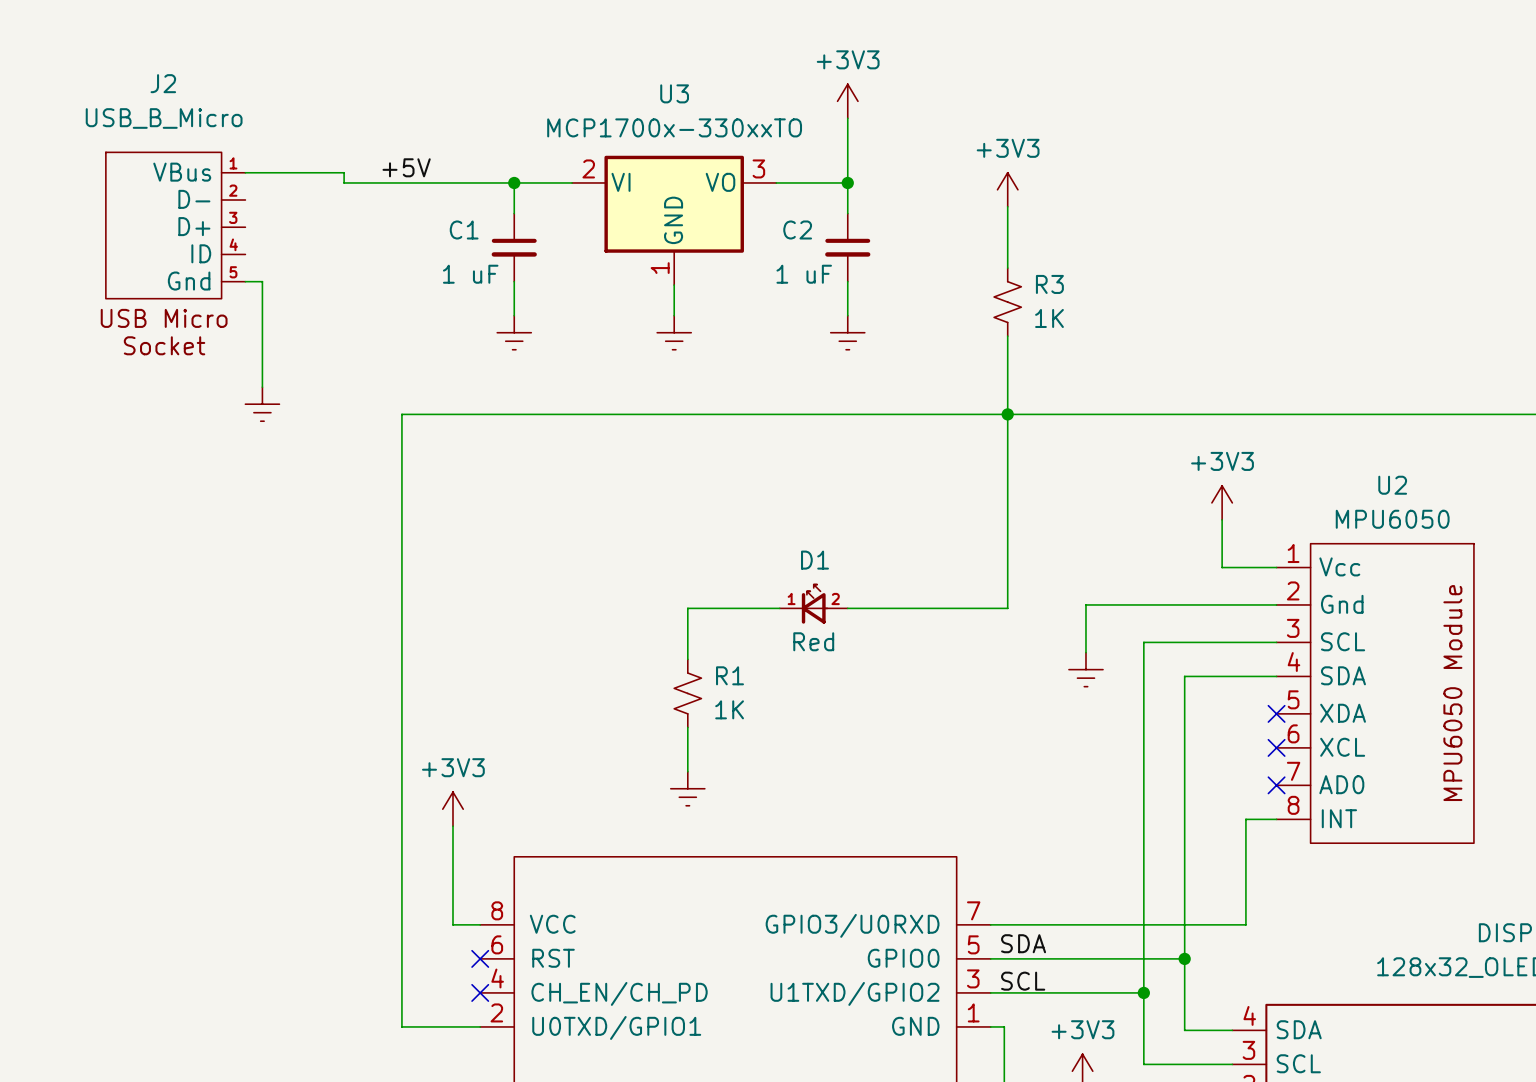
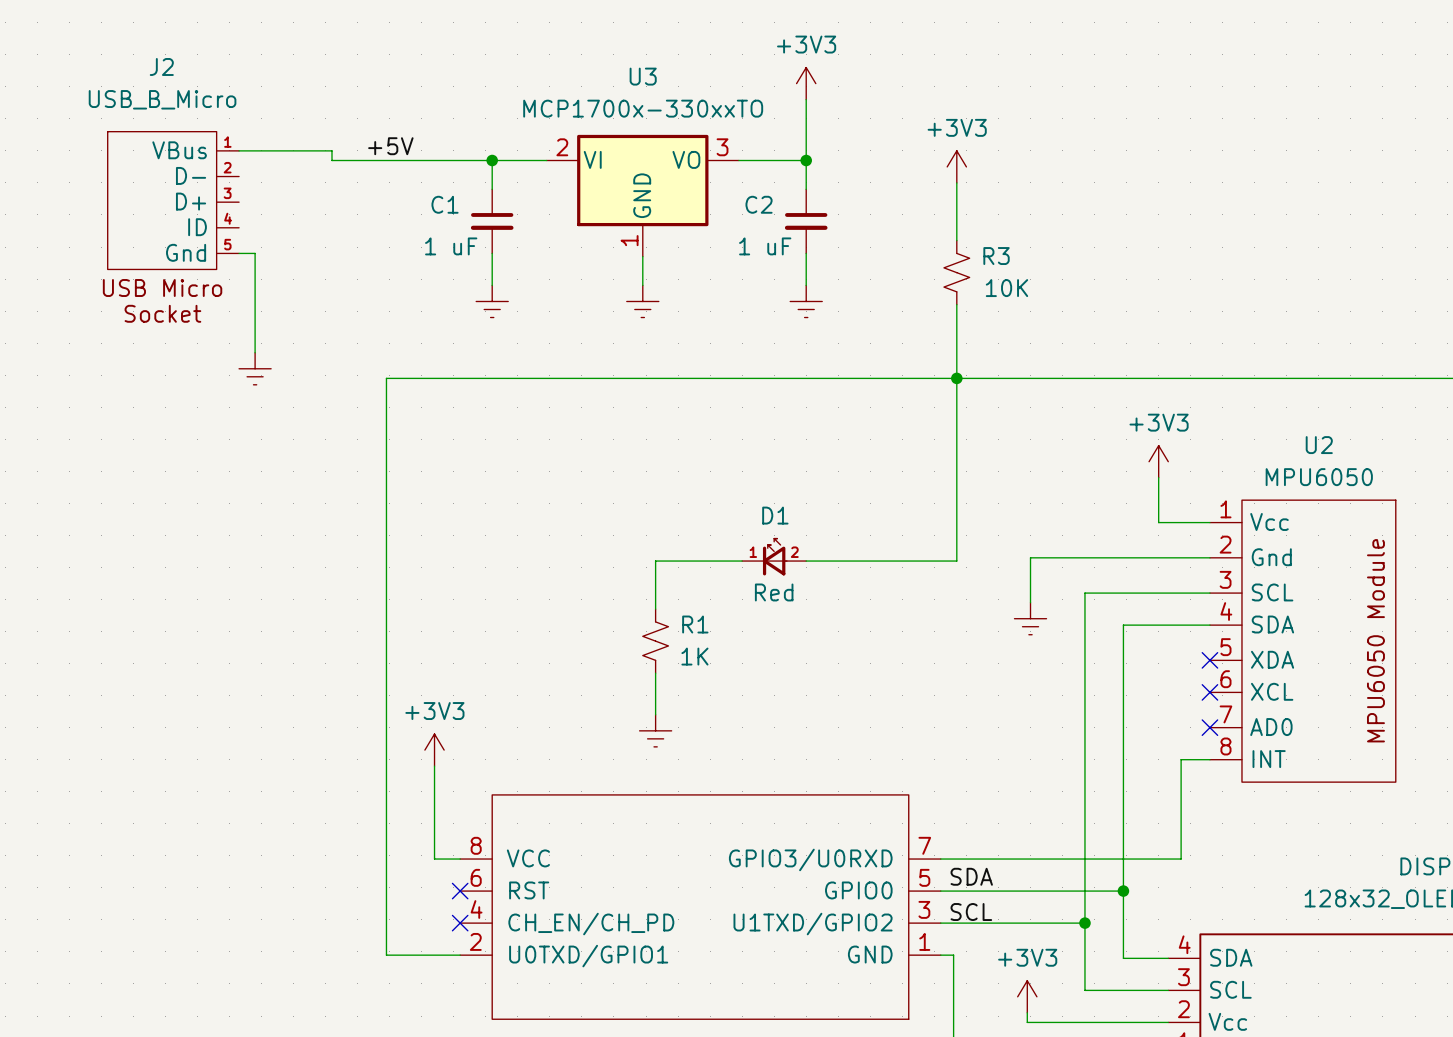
R3 value: 1K (1049, 318) -> 10K (1006, 288)

